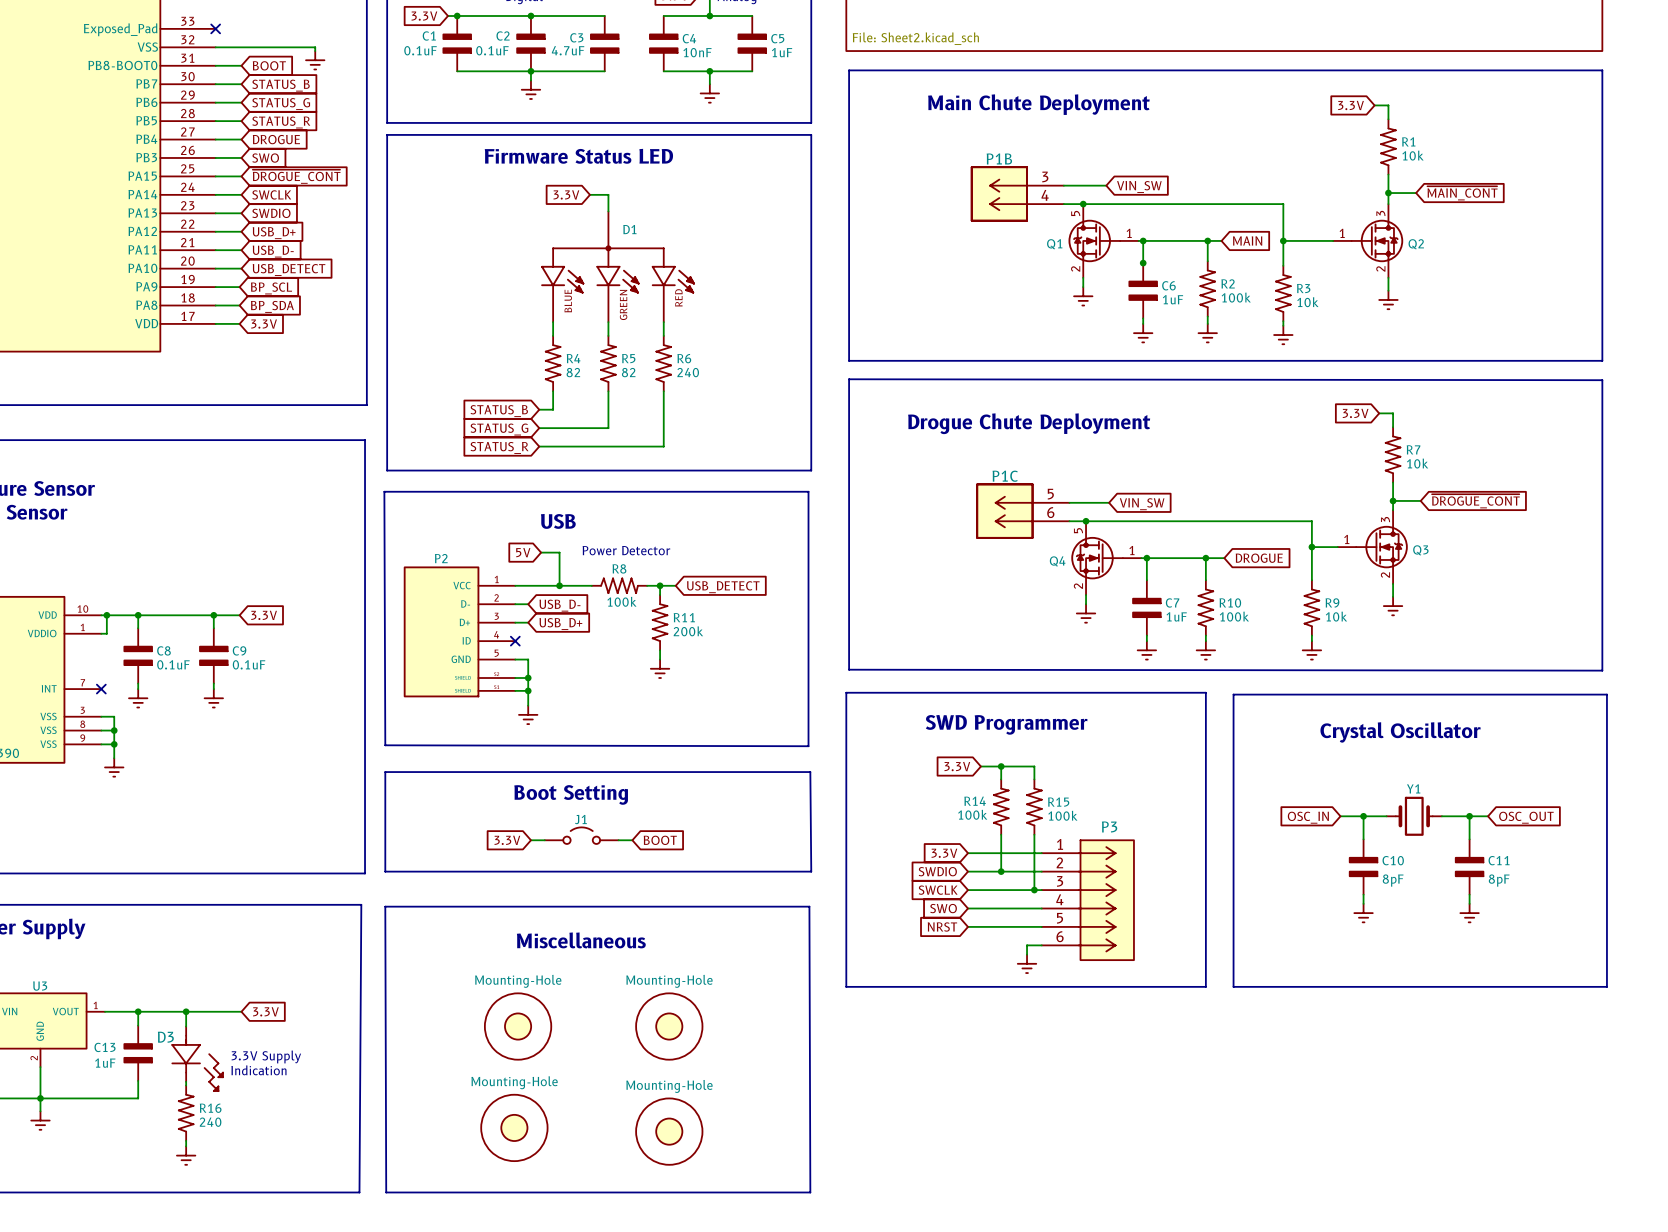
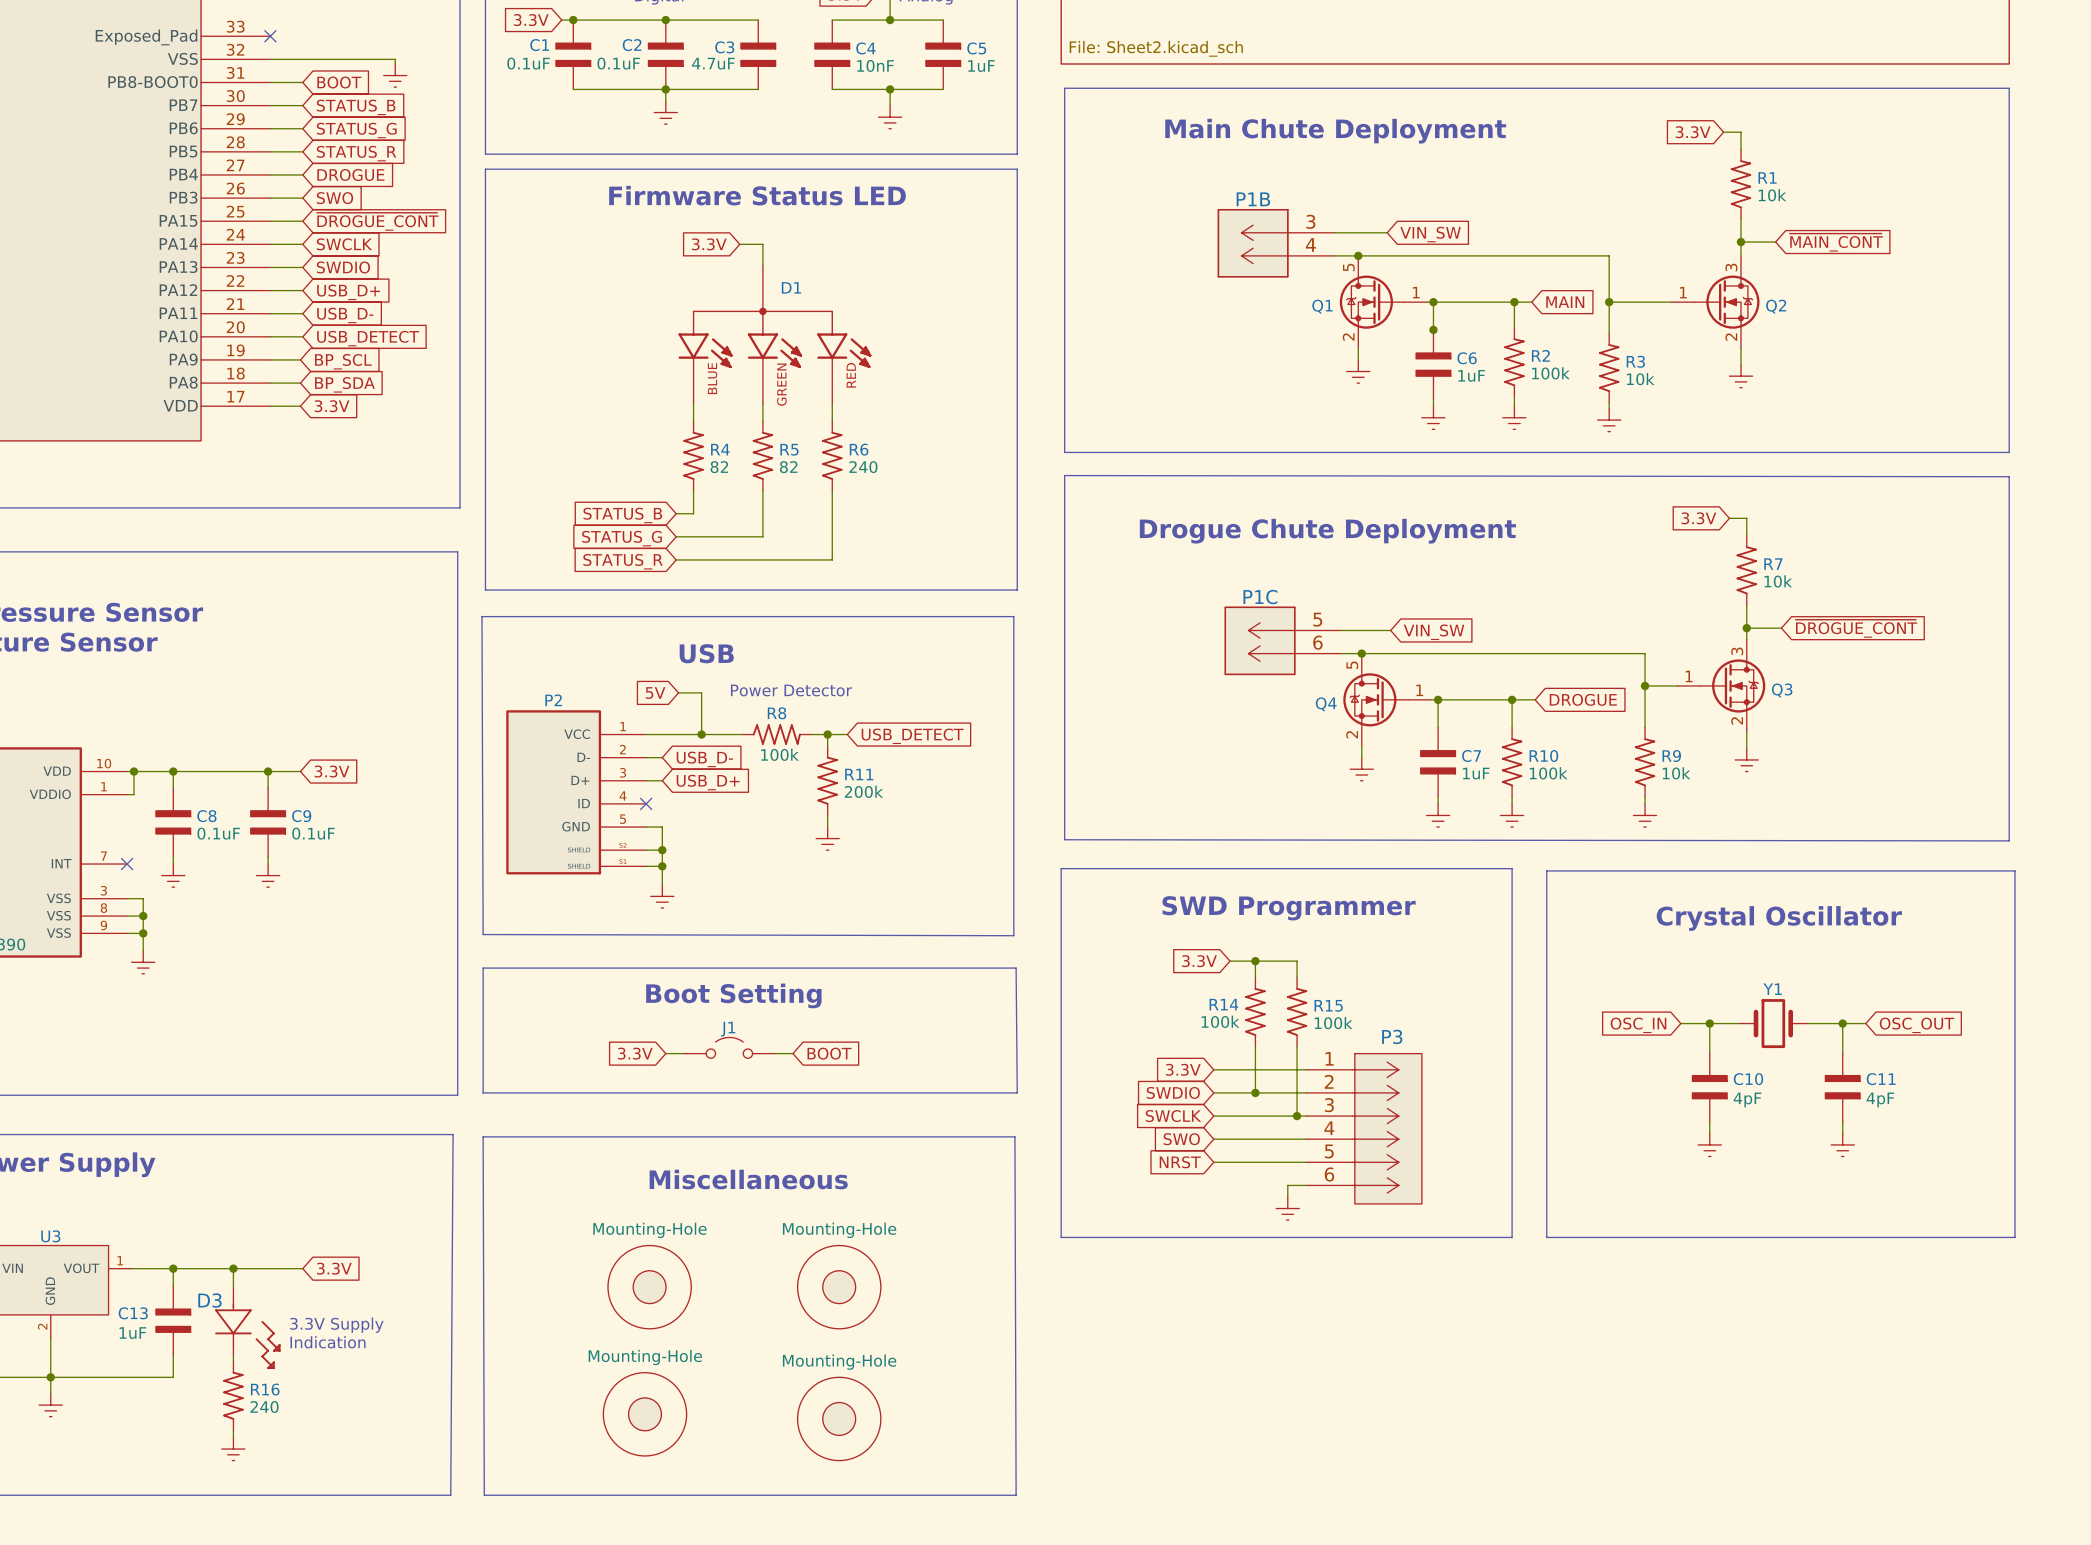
C10 value: 8pF (1393, 880) -> 4pF (1747, 1100)
C11 value: 8pF (1499, 880) -> 4pF (1880, 1100)

